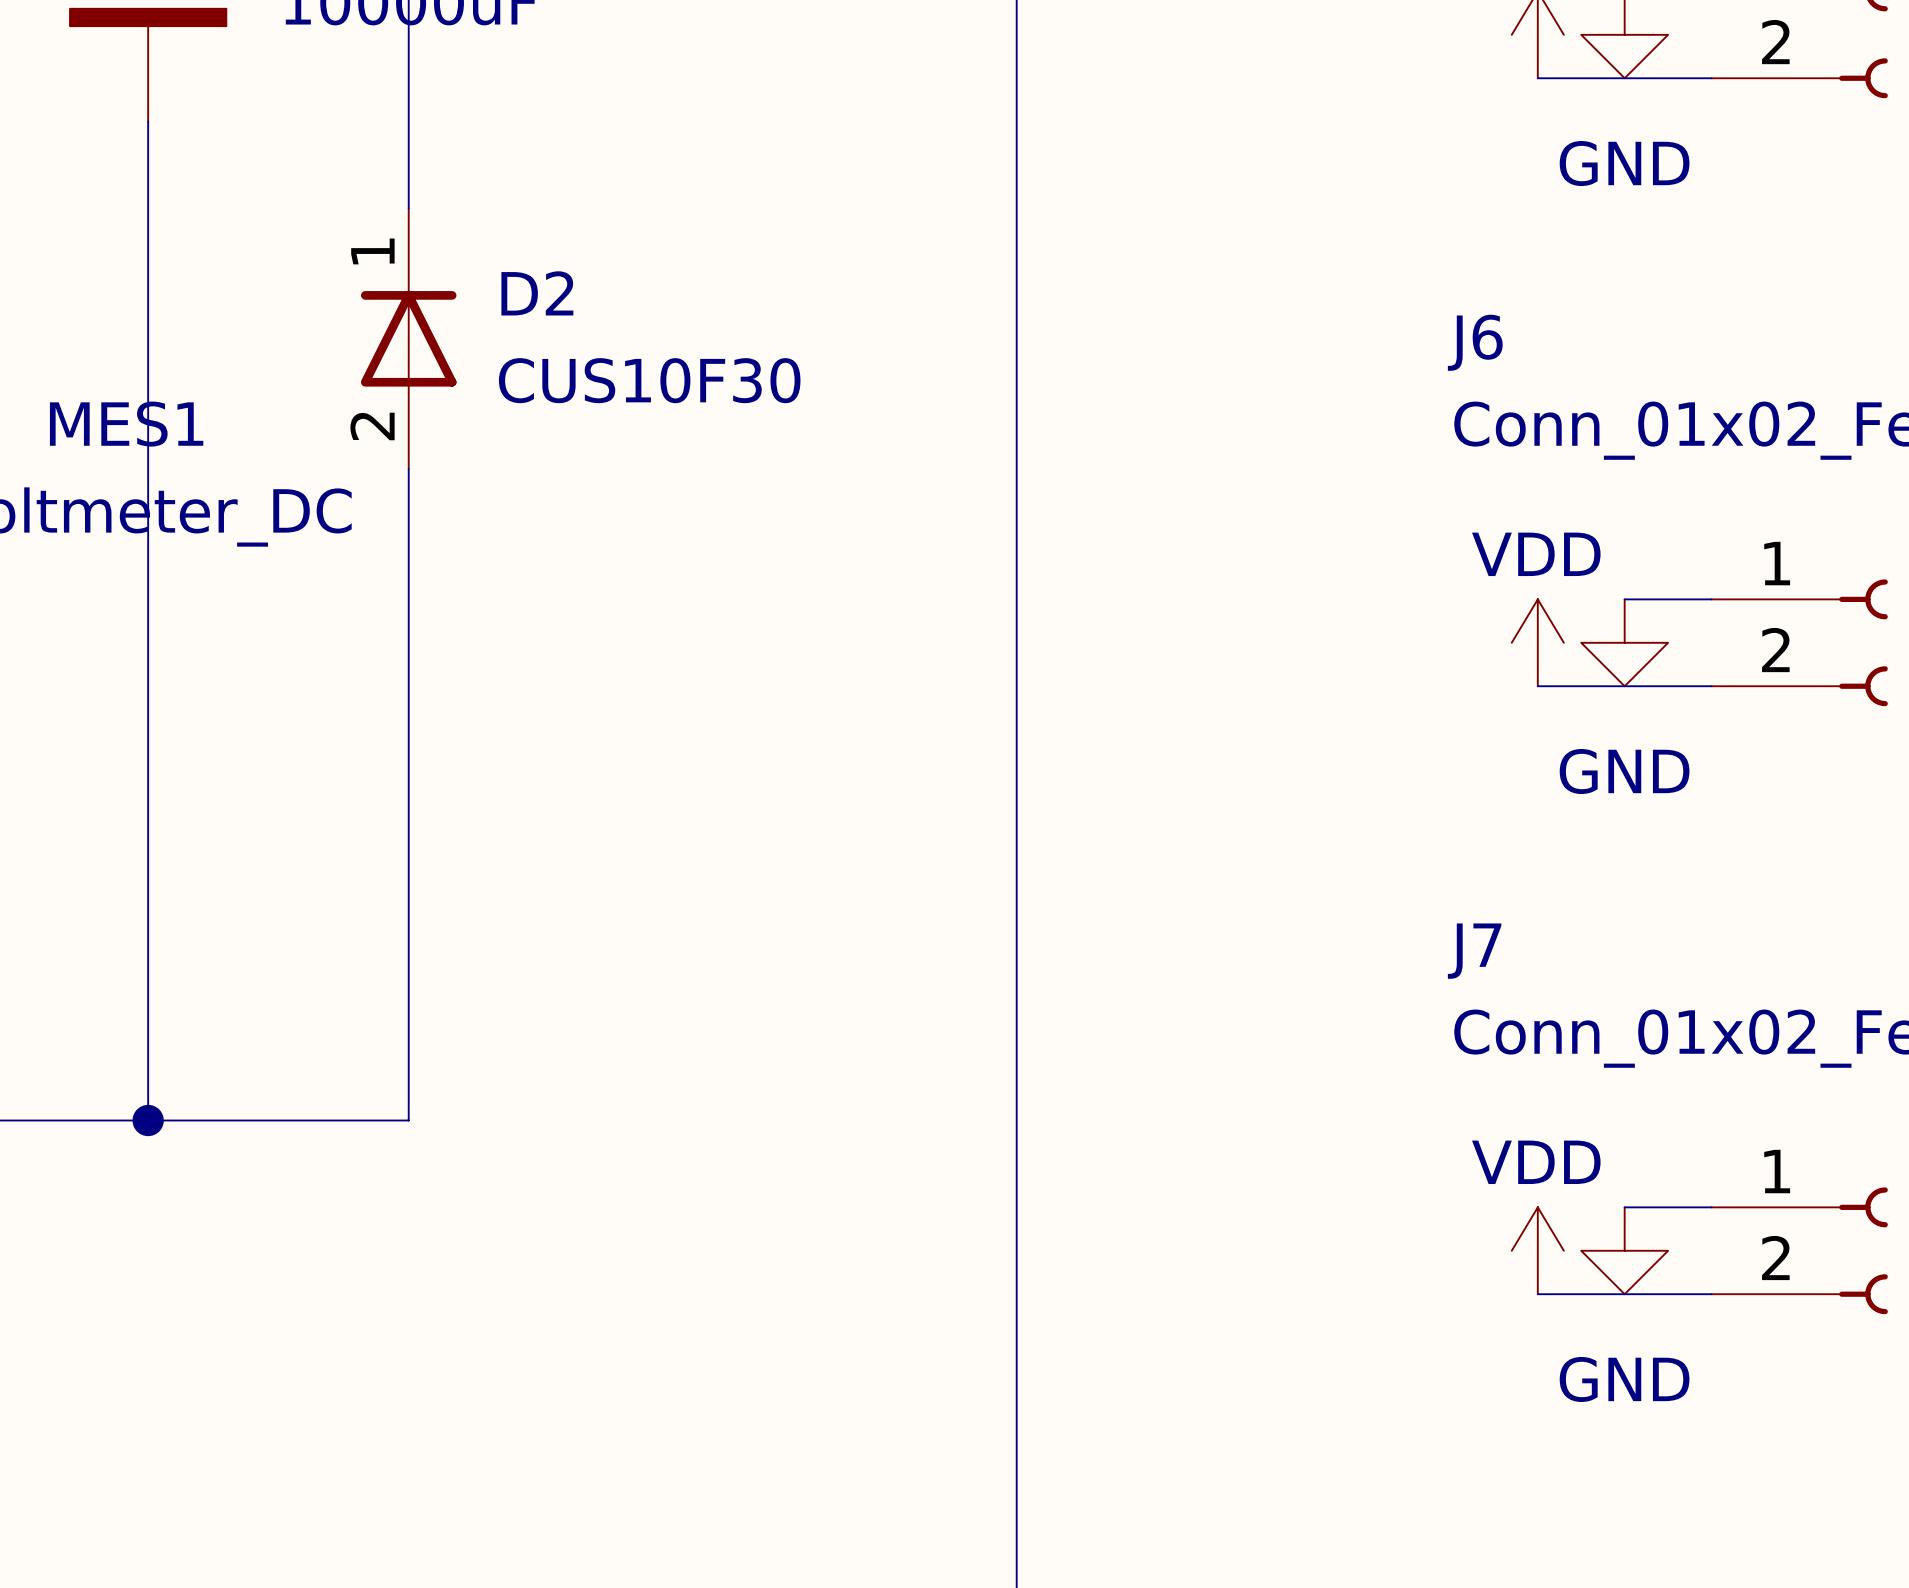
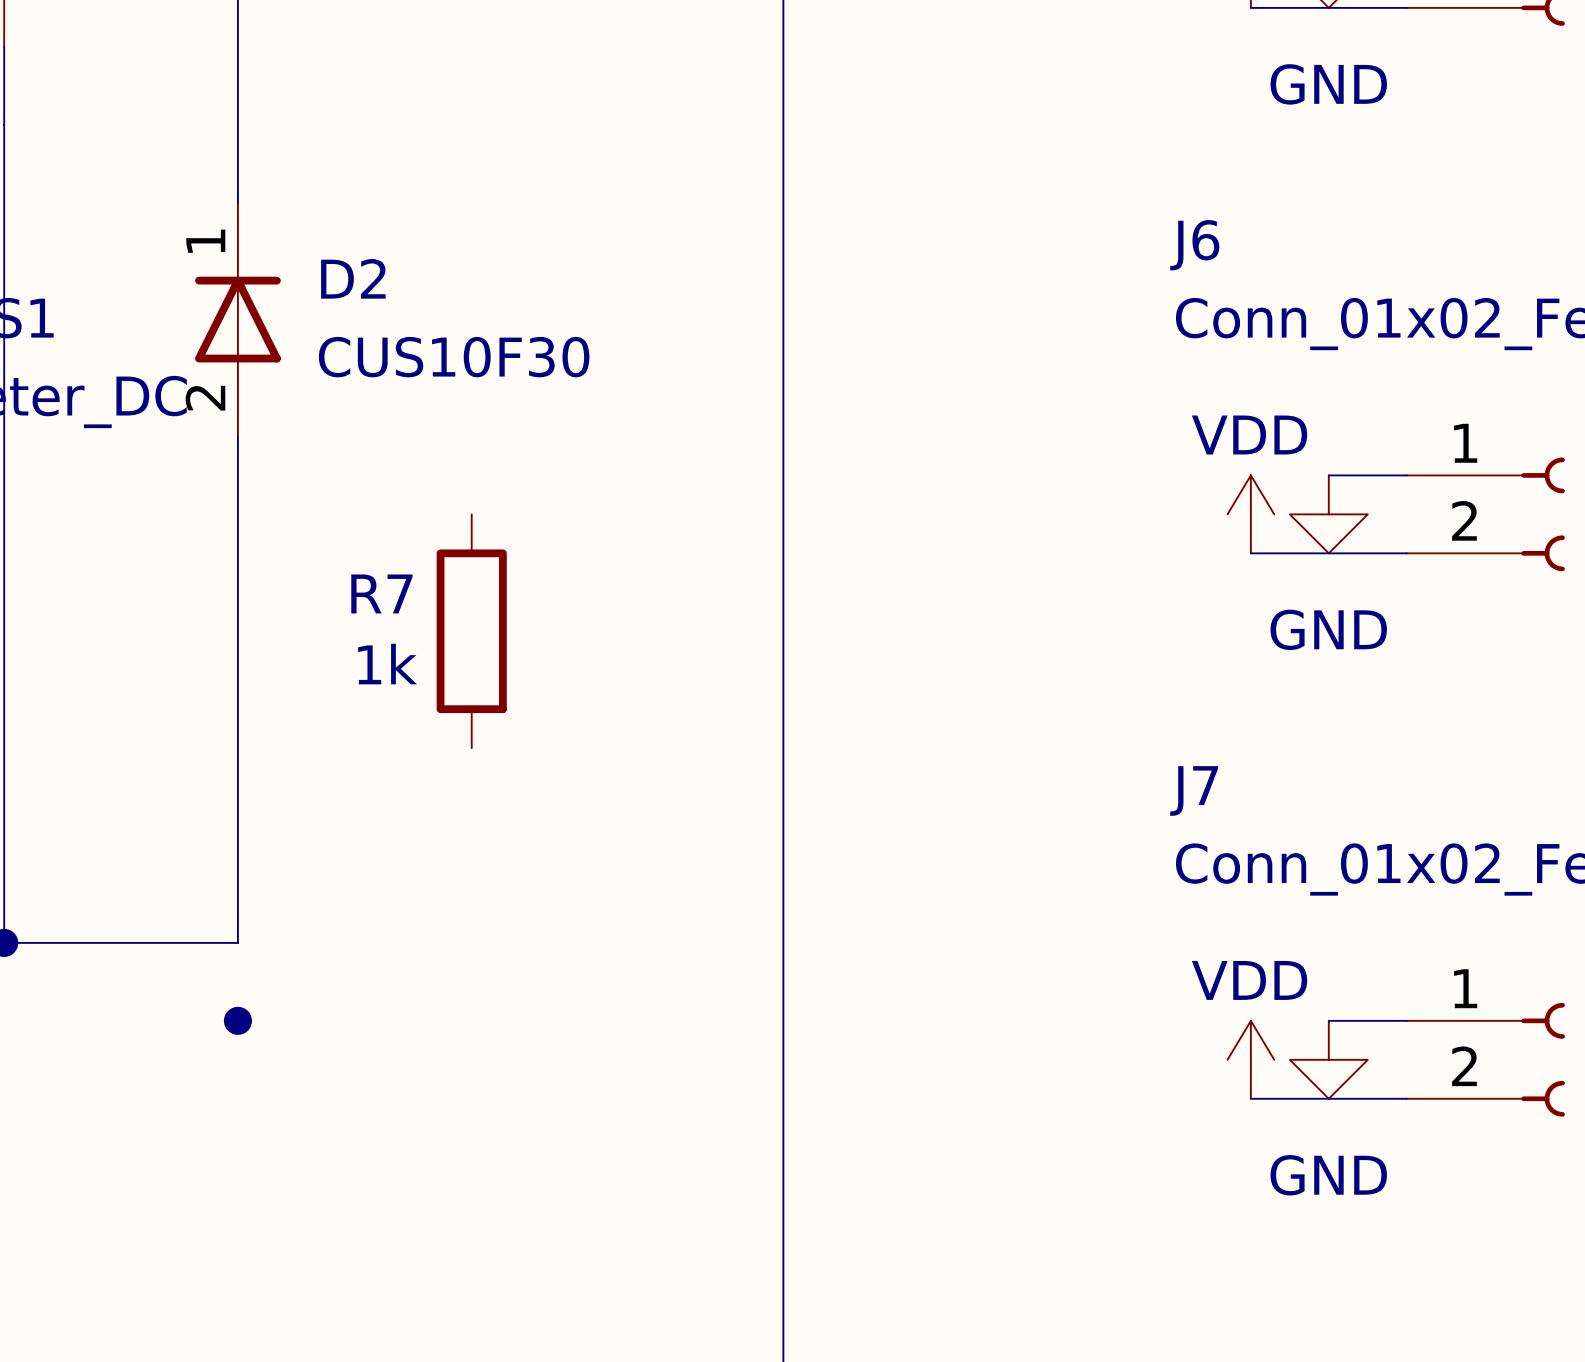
D2 position: (408, 338) -> (237, 319)
R7: none -> 1k (471, 631)
junction: none -> (237, 1020)

